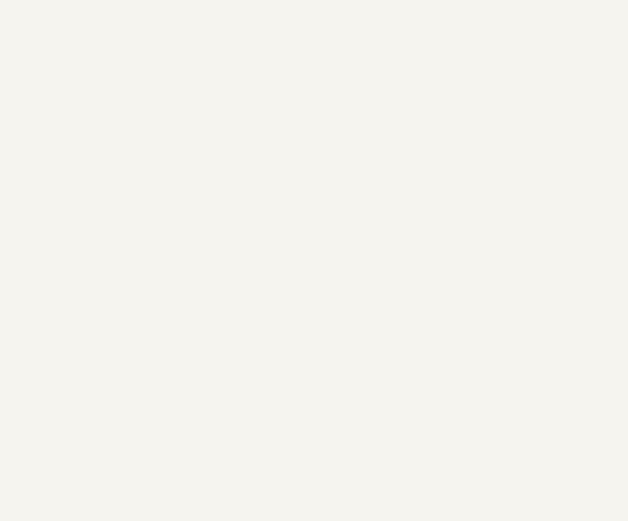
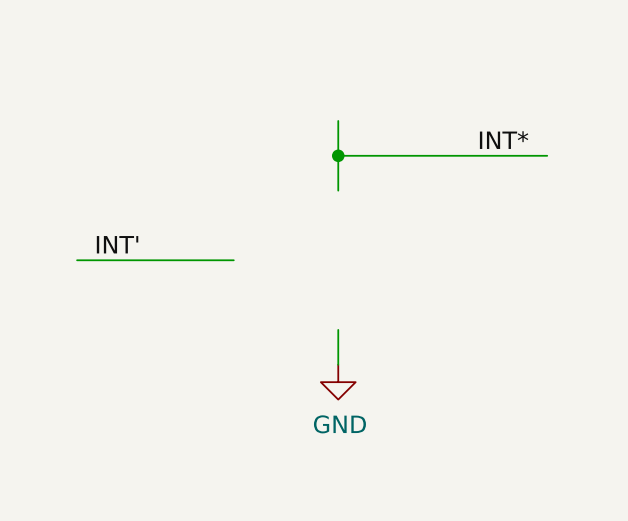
wire: none -> (338, 120) (338, 190)
label: none -> INT* (504, 140)
wire: none -> (338, 155) (547, 155)
junction: none -> (338, 155)
label: none -> INT' (117, 244)
wire: none -> (77, 260) (233, 260)
wire: none -> (338, 329) (338, 364)
power symbol: none -> GND (338, 382)

